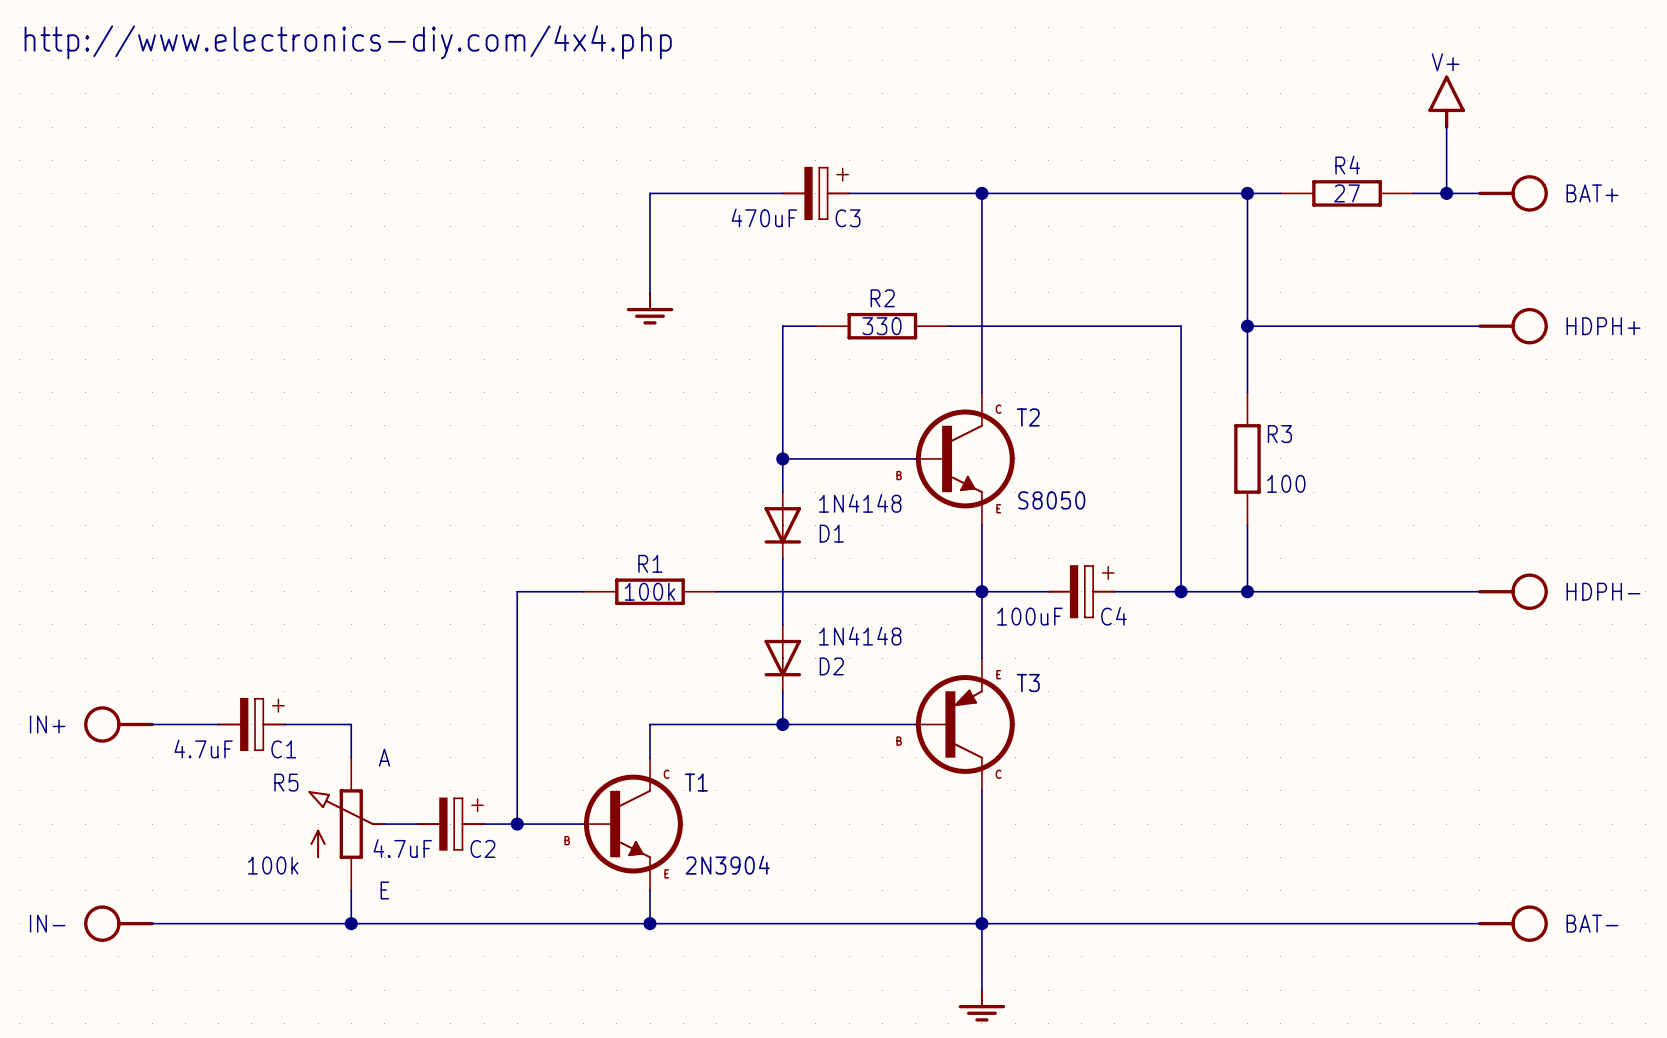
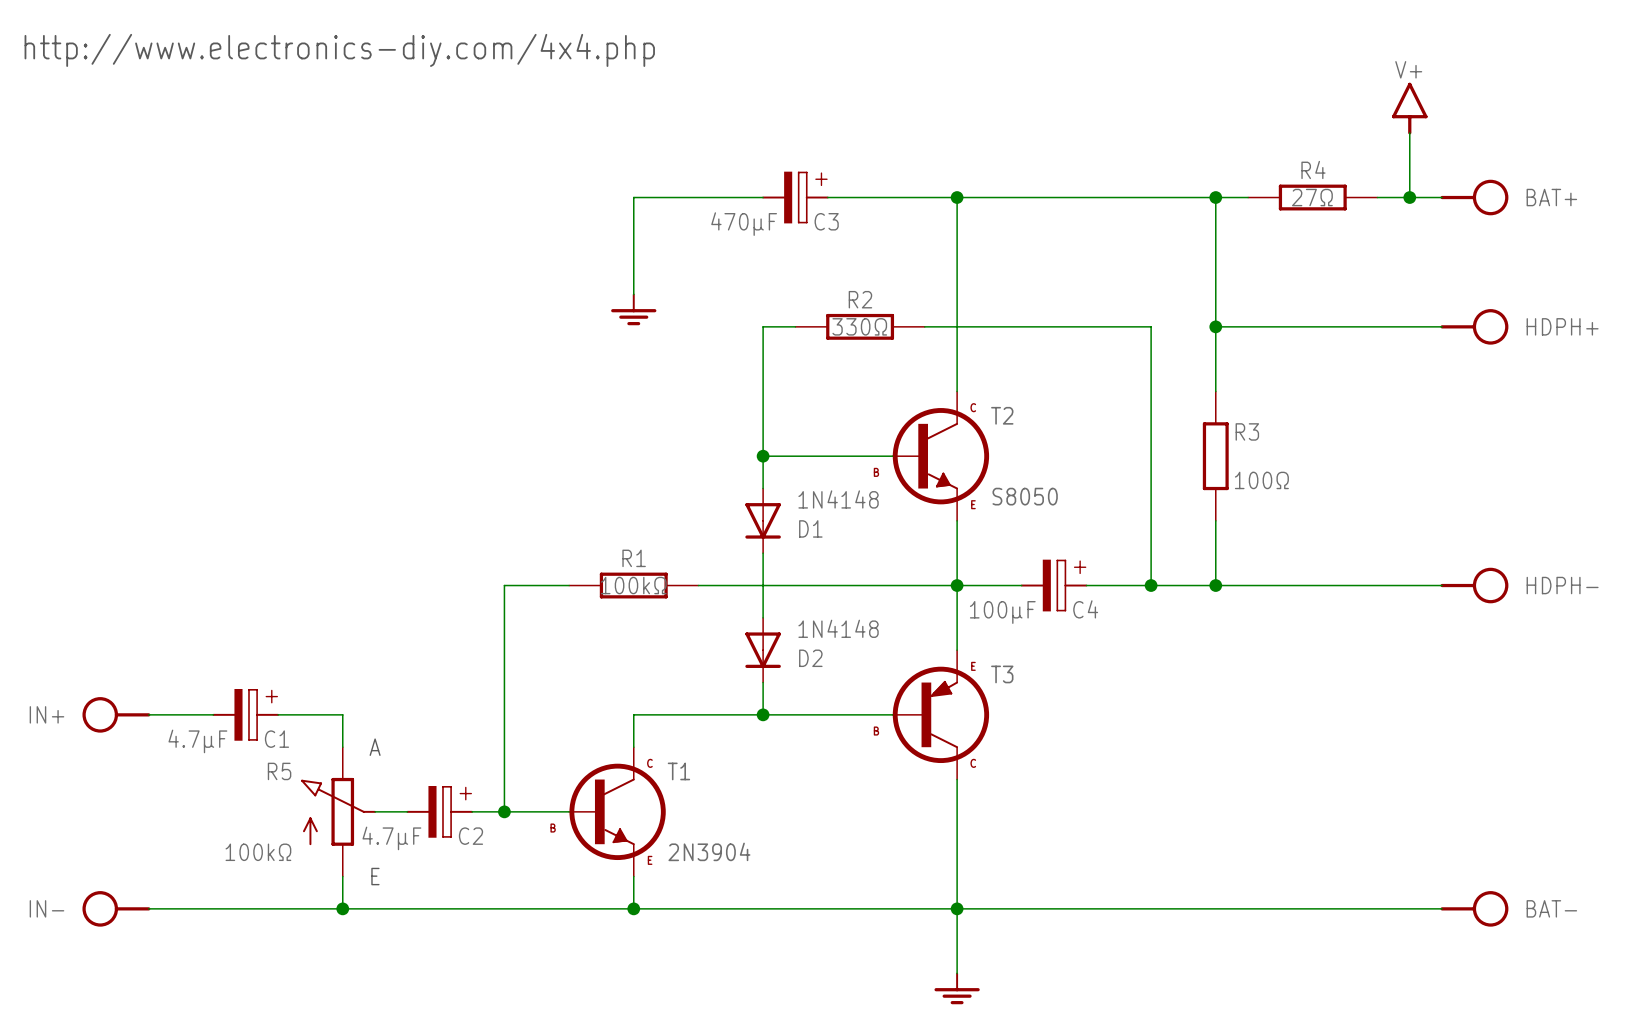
R4 value: 27 (1347, 193) -> 27Ω (1312, 197)
C3 value: 470uF (764, 217) -> 470μF (744, 224)
R2 value: 330 (882, 326) -> 330Ω (859, 326)
R3 value: 100 (1286, 483) -> 100Ω (1261, 480)
R1 value: 100k (650, 591) -> 100kΩ (633, 585)
C4 value: 100uF (1029, 616) -> 100μF (1002, 612)
C1 value: 4.7uF (203, 748) -> 4.7μF (197, 741)
C2 value: 4.7uF (402, 848) -> 4.7μF (391, 838)
R5 value: 100k (273, 865) -> 100kΩ (258, 852)

